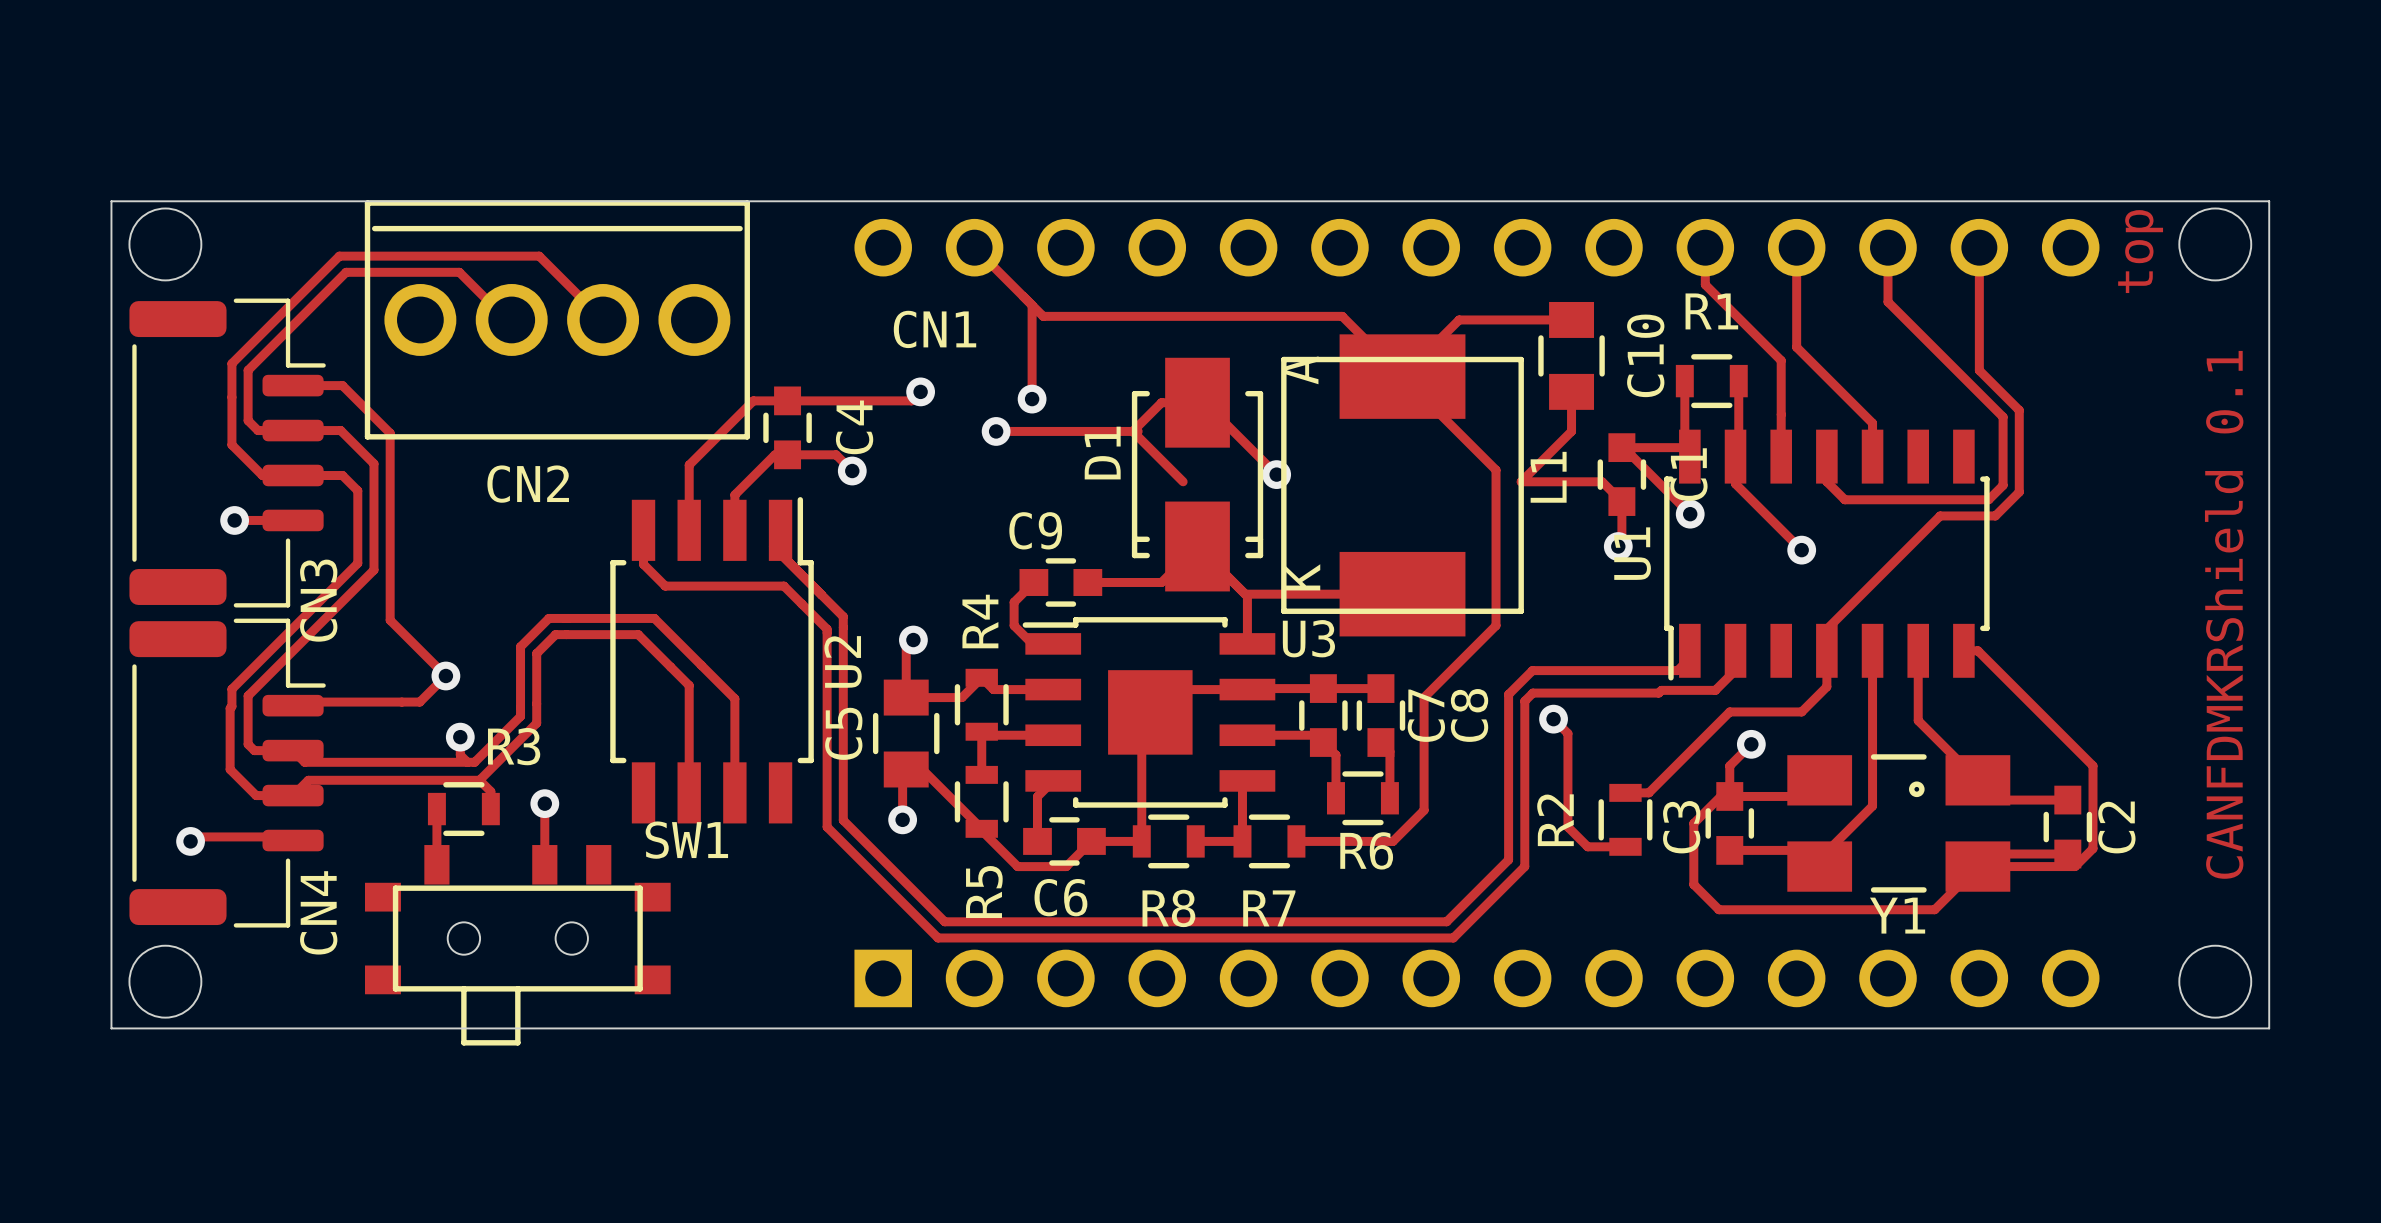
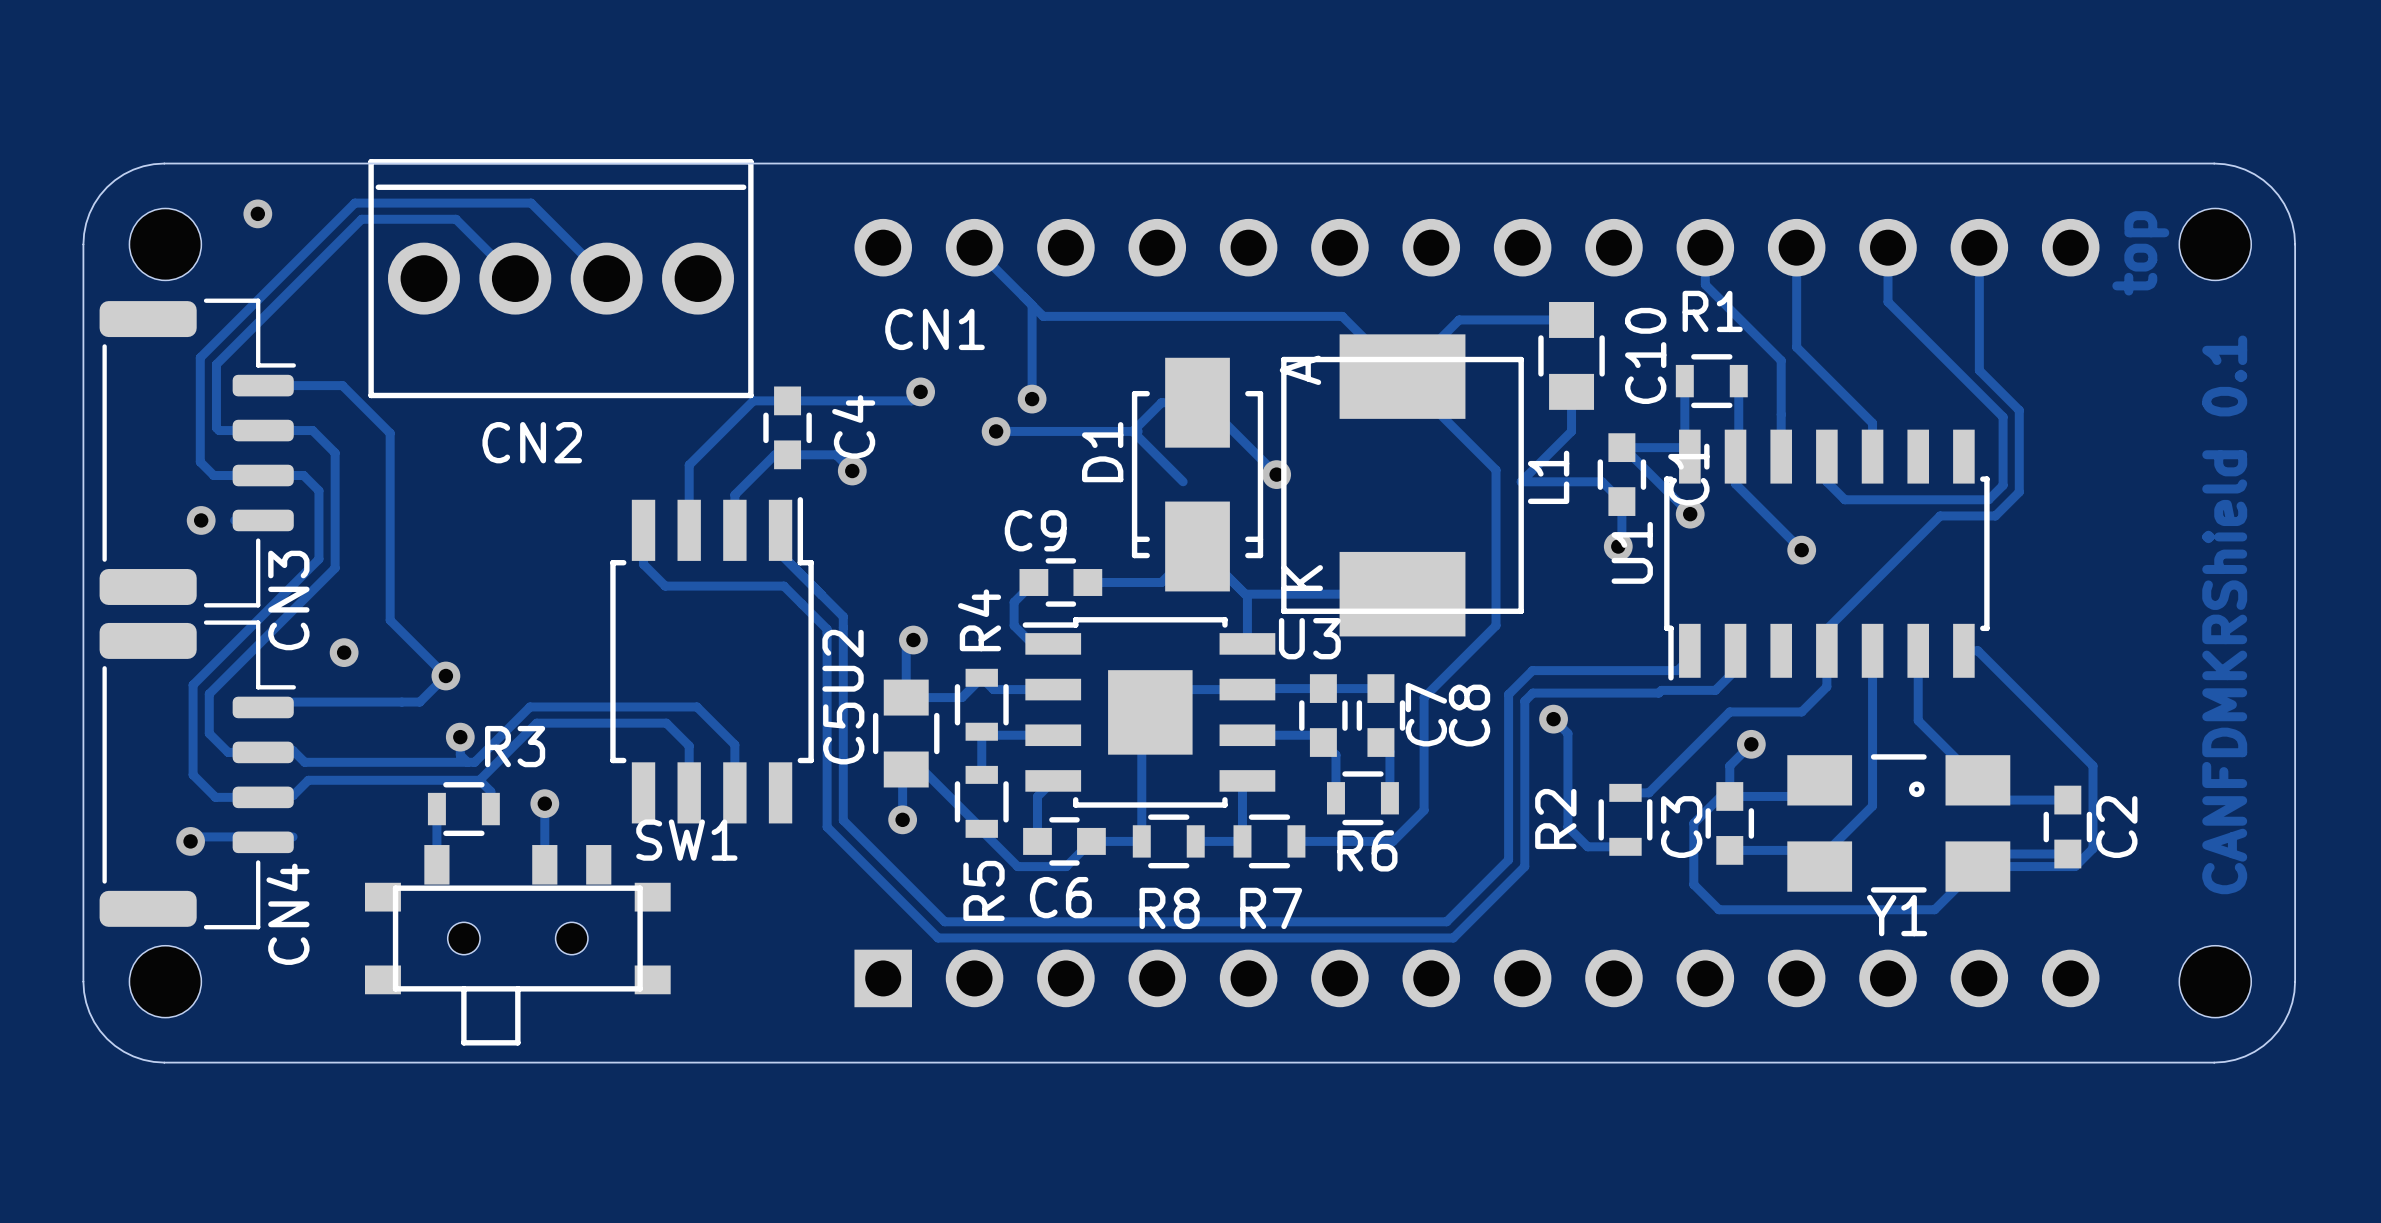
board edge: (111, 201) (111, 1028) (2269, 1028) (2269, 201) (111, 201) -> (164, 163) (133, 169) (107, 187) (89, 213) (83, 244) (83, 981) (86, 1002) (94, 1022) (107, 1038) (133, 1056) (164, 1062) (2214, 1062) (2235, 1059) (2254, 1051) (2271, 1038) (2288, 1012) (2295, 981) (2295, 244) (2292, 223) (2284, 203) (2271, 187) (2245, 169) (2214, 163) (164, 163)
via: none -> (257, 213)
track: (511, 319) (507, 319) (459, 272) (346, 272) (248, 370) (248, 420) (258, 430) -> (515, 278) (455, 219) (361, 219) (216, 364) (216, 427) (219, 430) (258, 430)
CN2 position: (557, 319) -> (560, 278)
track: (603, 319) (539, 256) (339, 256) (231, 363) (231, 444) (262, 475) -> (606, 278) (531, 203) (354, 203) (200, 357) (200, 462) (213, 475) (262, 475)
track: (312, 430) (340, 430) (373, 463) (373, 570) (248, 695) (248, 744) (254, 750) -> (312, 430) (335, 453) (335, 568) (209, 693) (209, 733) (228, 752) (263, 752)
CN3 position: (227, 453) -> (197, 453)
track: (303, 475) (342, 475) (357, 490) (357, 563) (231, 689) (230, 769) (256, 795) -> (303, 475) (318, 490) (318, 559) (193, 684) (193, 774) (215, 797) (263, 797)
via position: (234, 520) -> (201, 520)
via: none -> (344, 652)
track: (520, 716) (520, 646) (548, 618) (654, 618) (734, 698) (734, 744) -> (520, 716) (530, 706) (696, 706) (734, 744)
track: (536, 723) (536, 653) (555, 634) (638, 634) (689, 685) (689, 745) -> (536, 723) (666, 723) (689, 745)
CN4 position: (227, 773) -> (197, 774)

